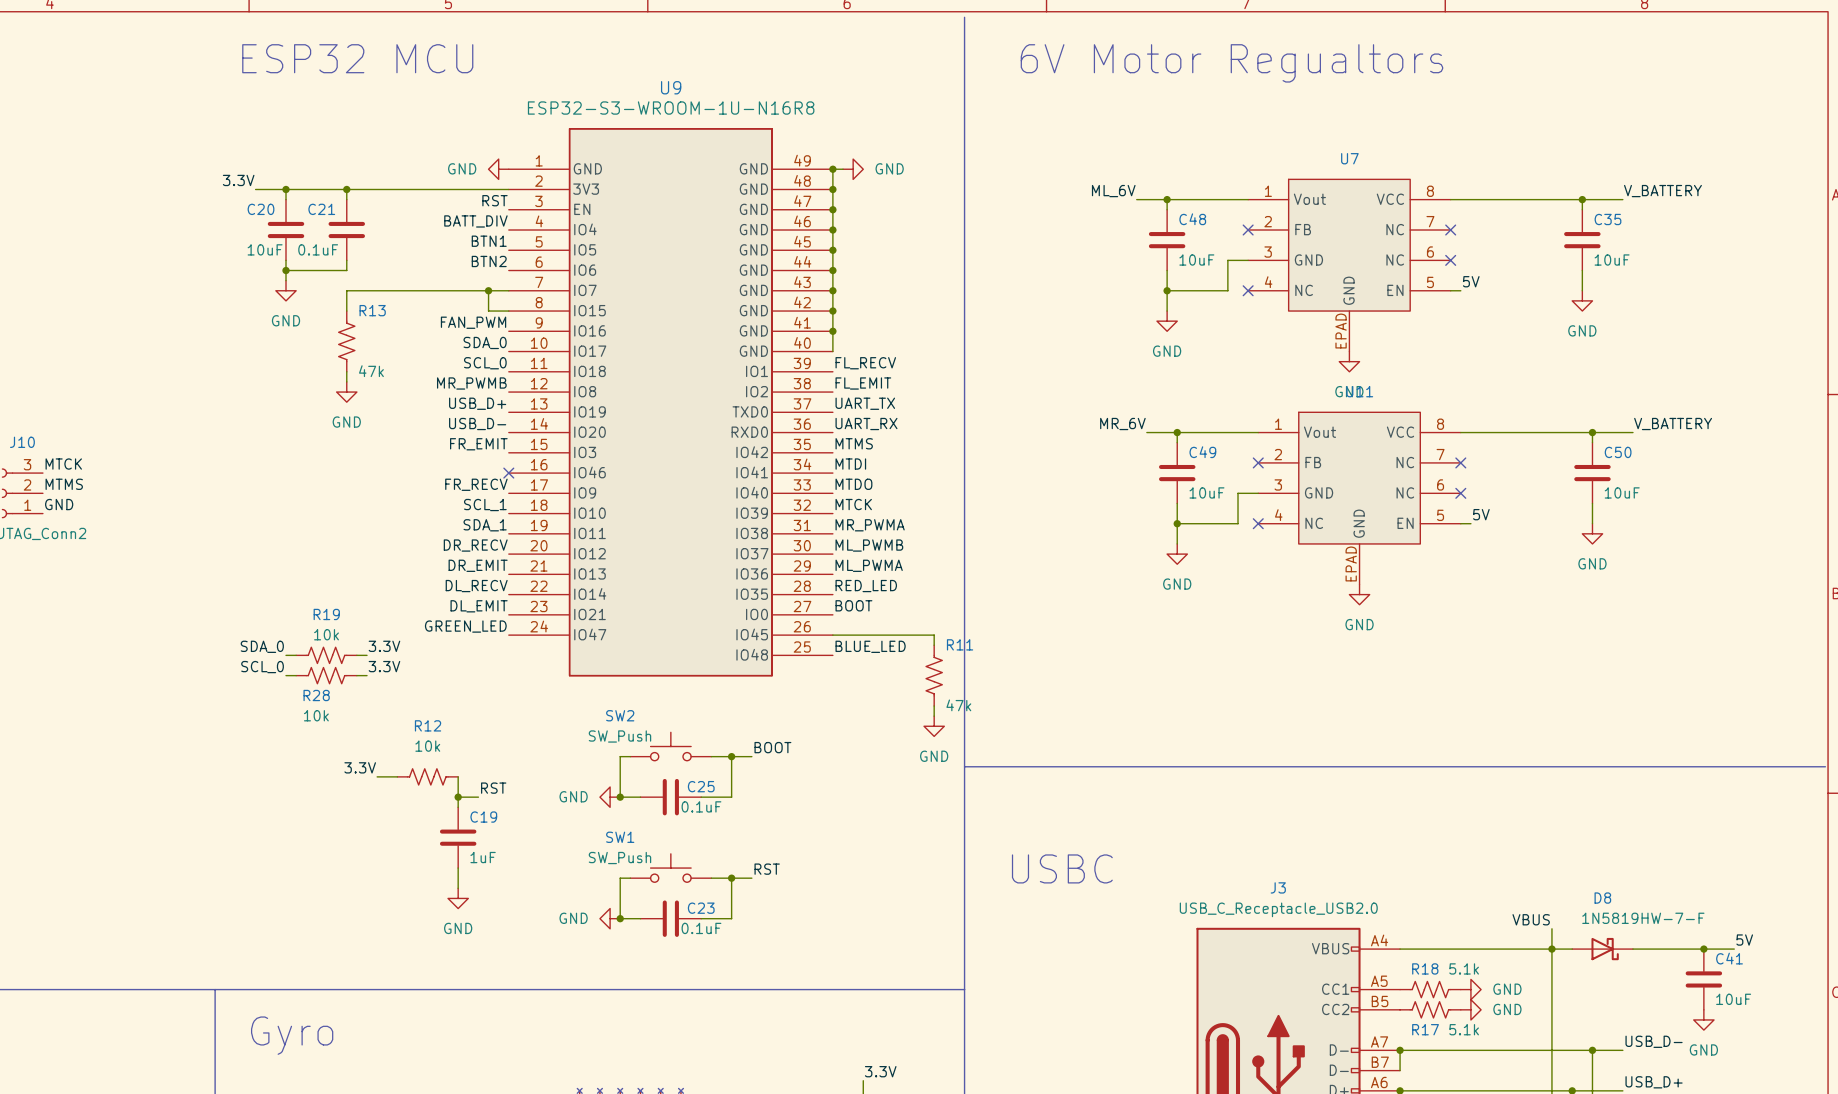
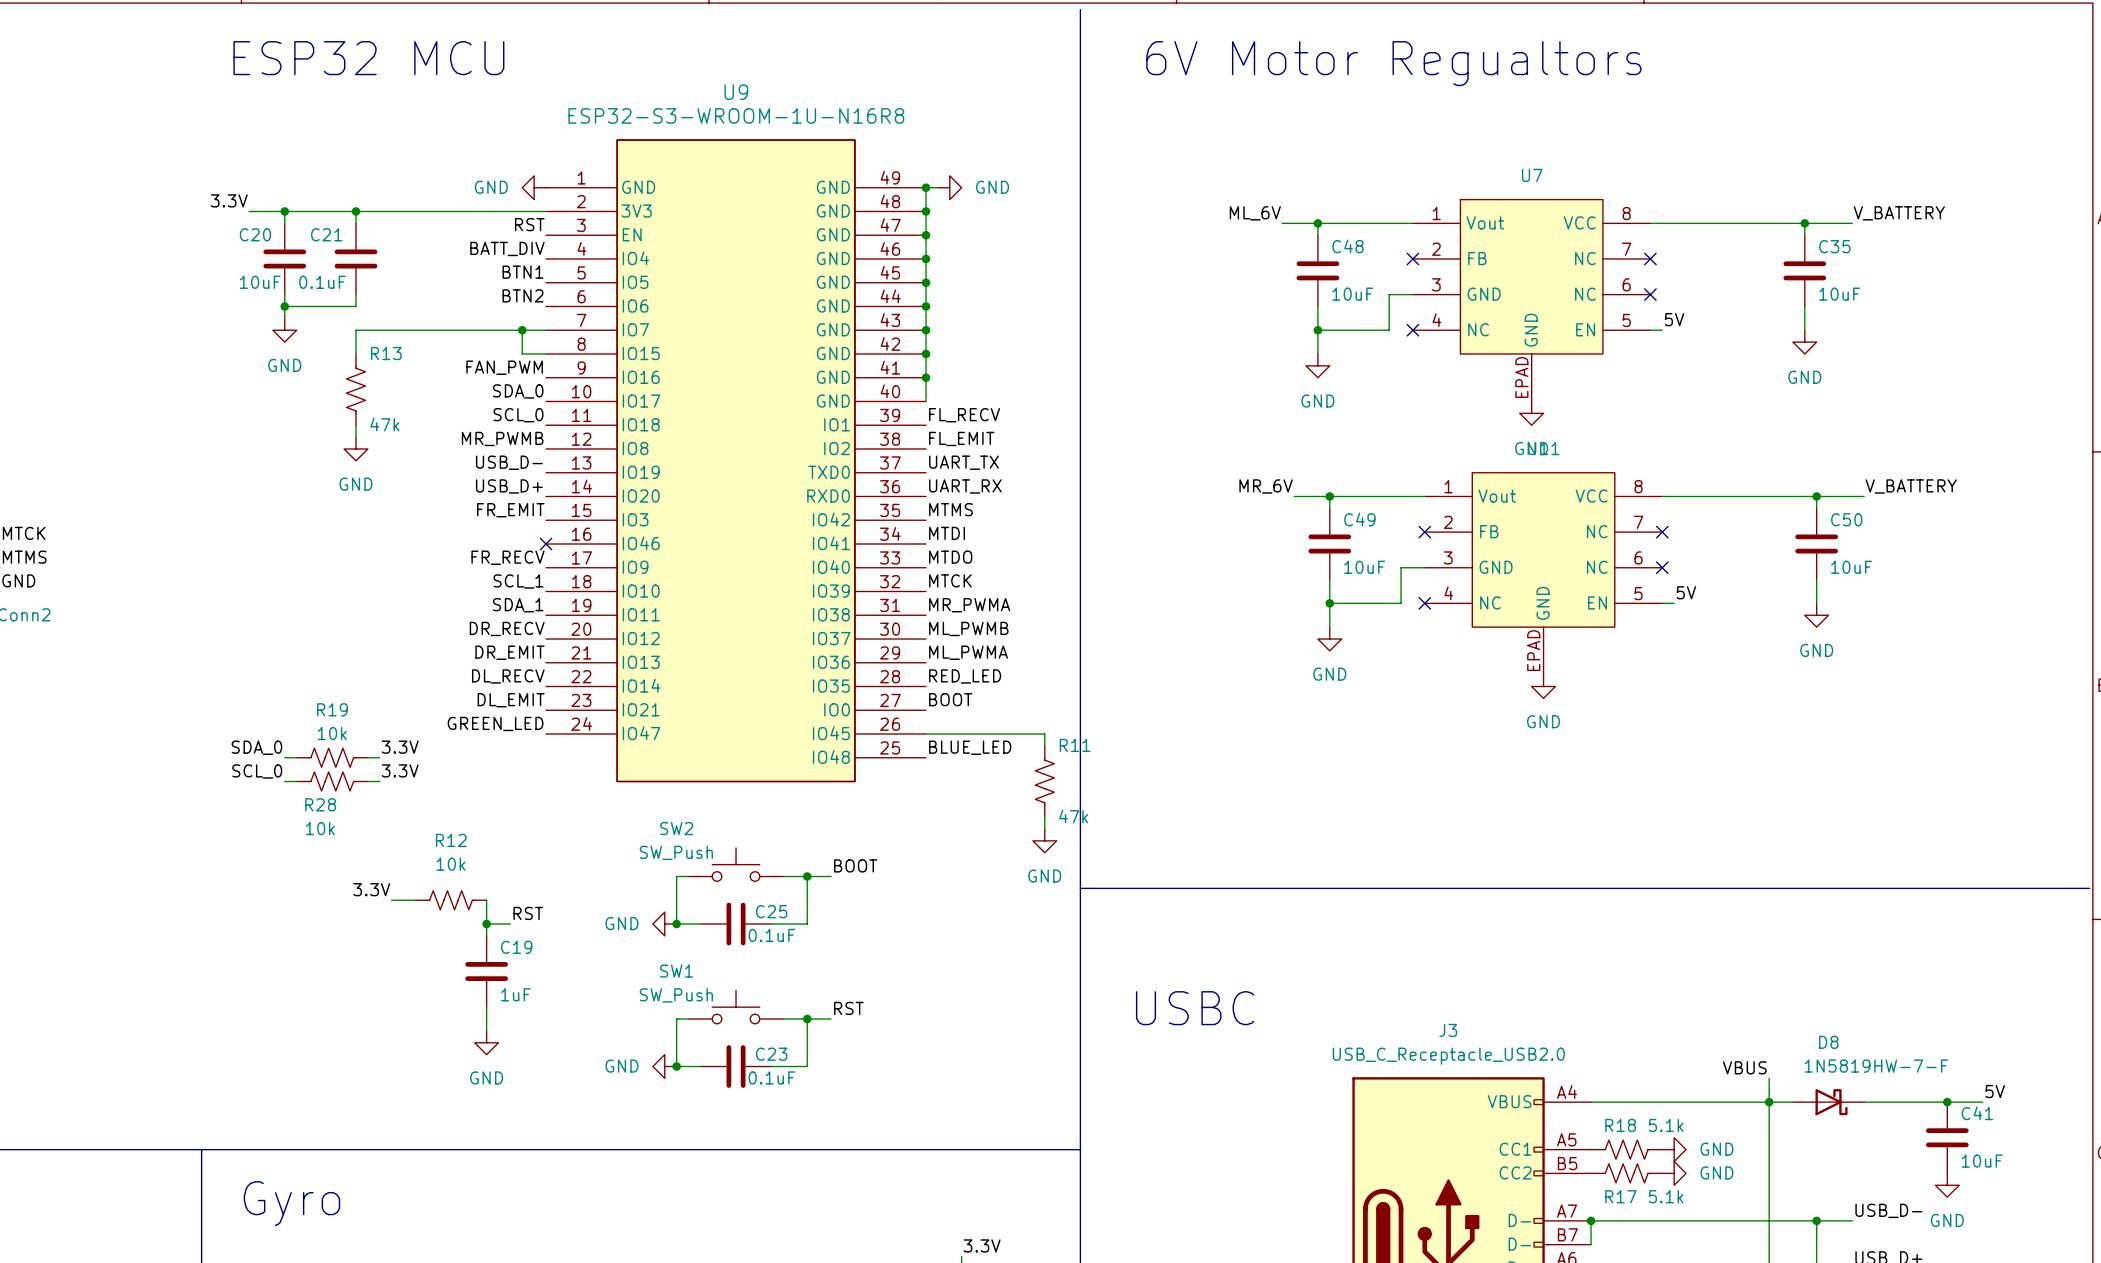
label: USB_D+ (477, 403) -> USB_D- (509, 462)
label: USB_D- (477, 424) -> USB_D+ (509, 486)

